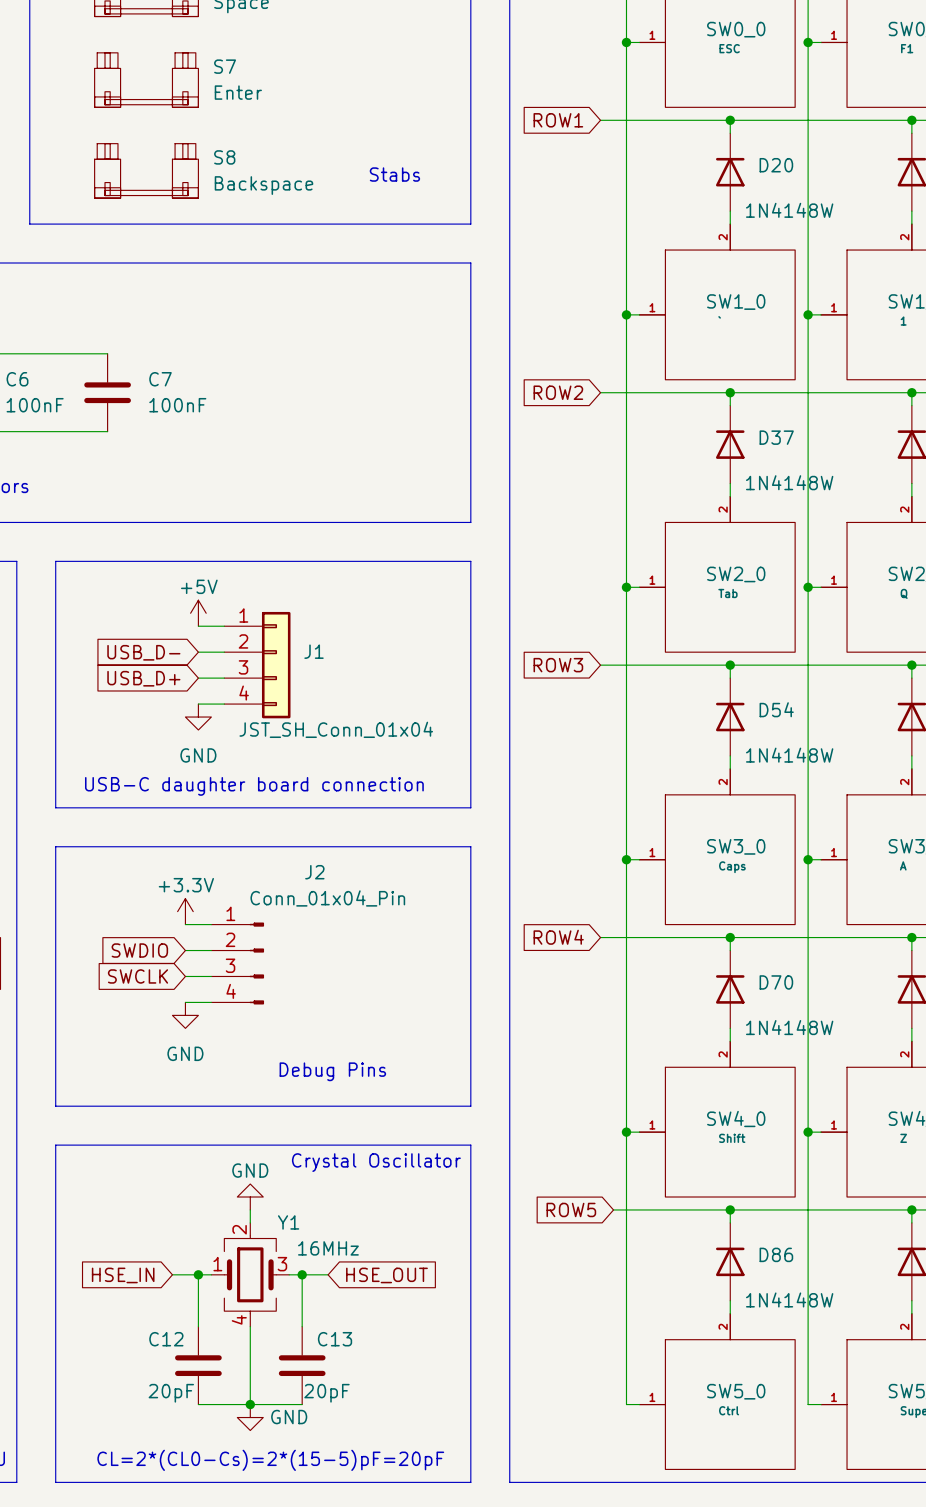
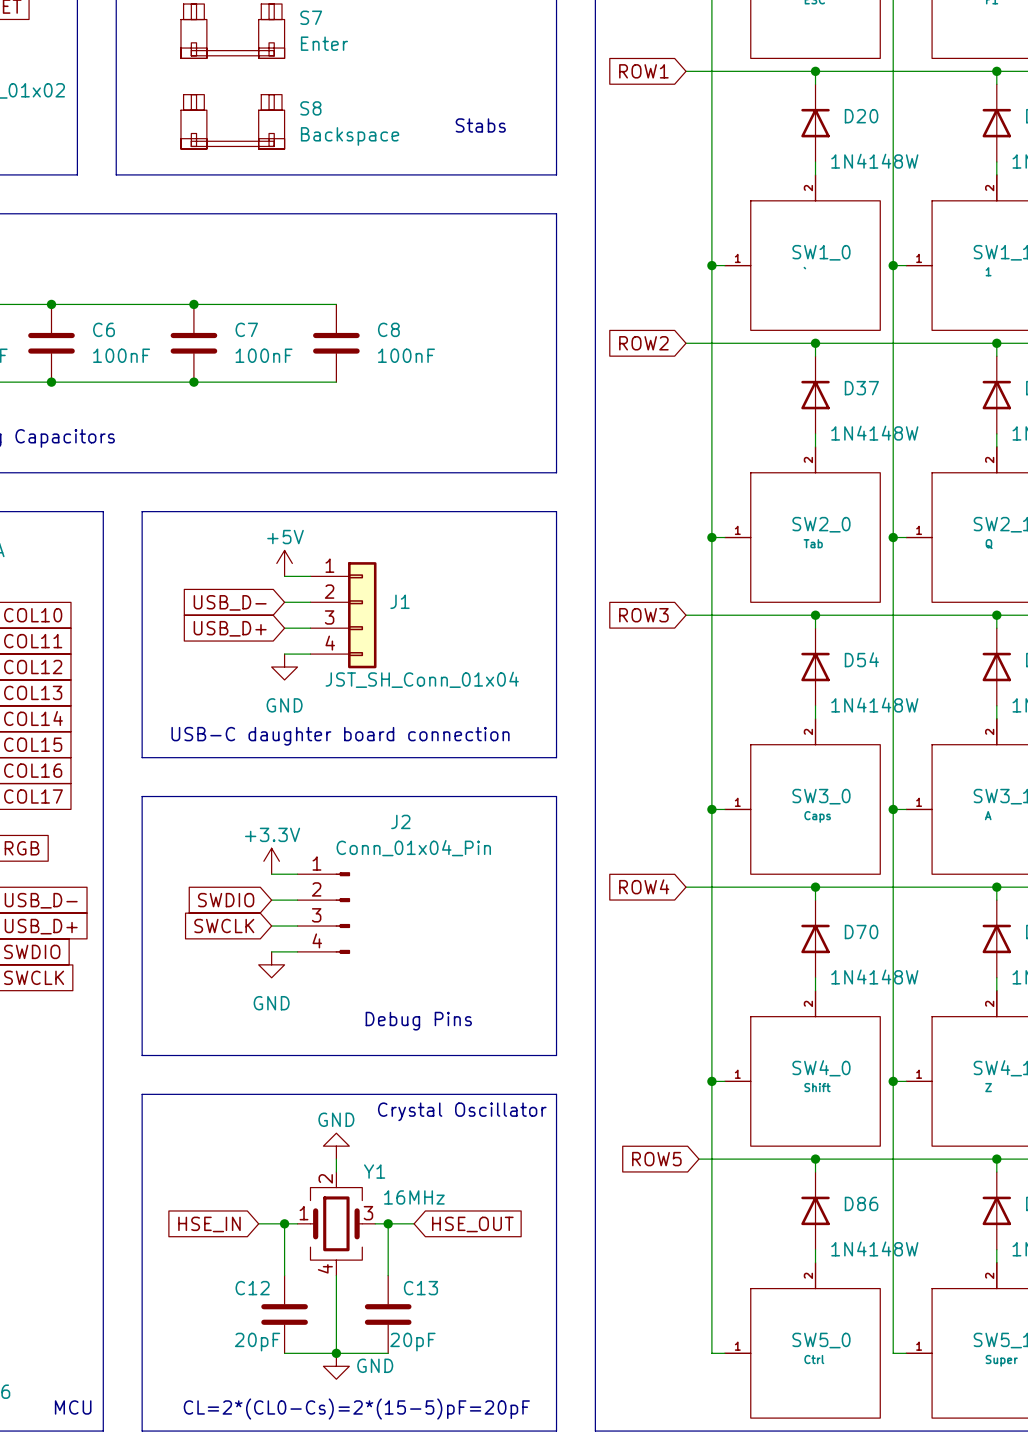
wire: none -> (193, 304) (336, 304)
junction: none -> (193, 304)
C8: none -> 100nF (336, 343)
wire: none -> (193, 382) (336, 382)
junction: none -> (193, 382)

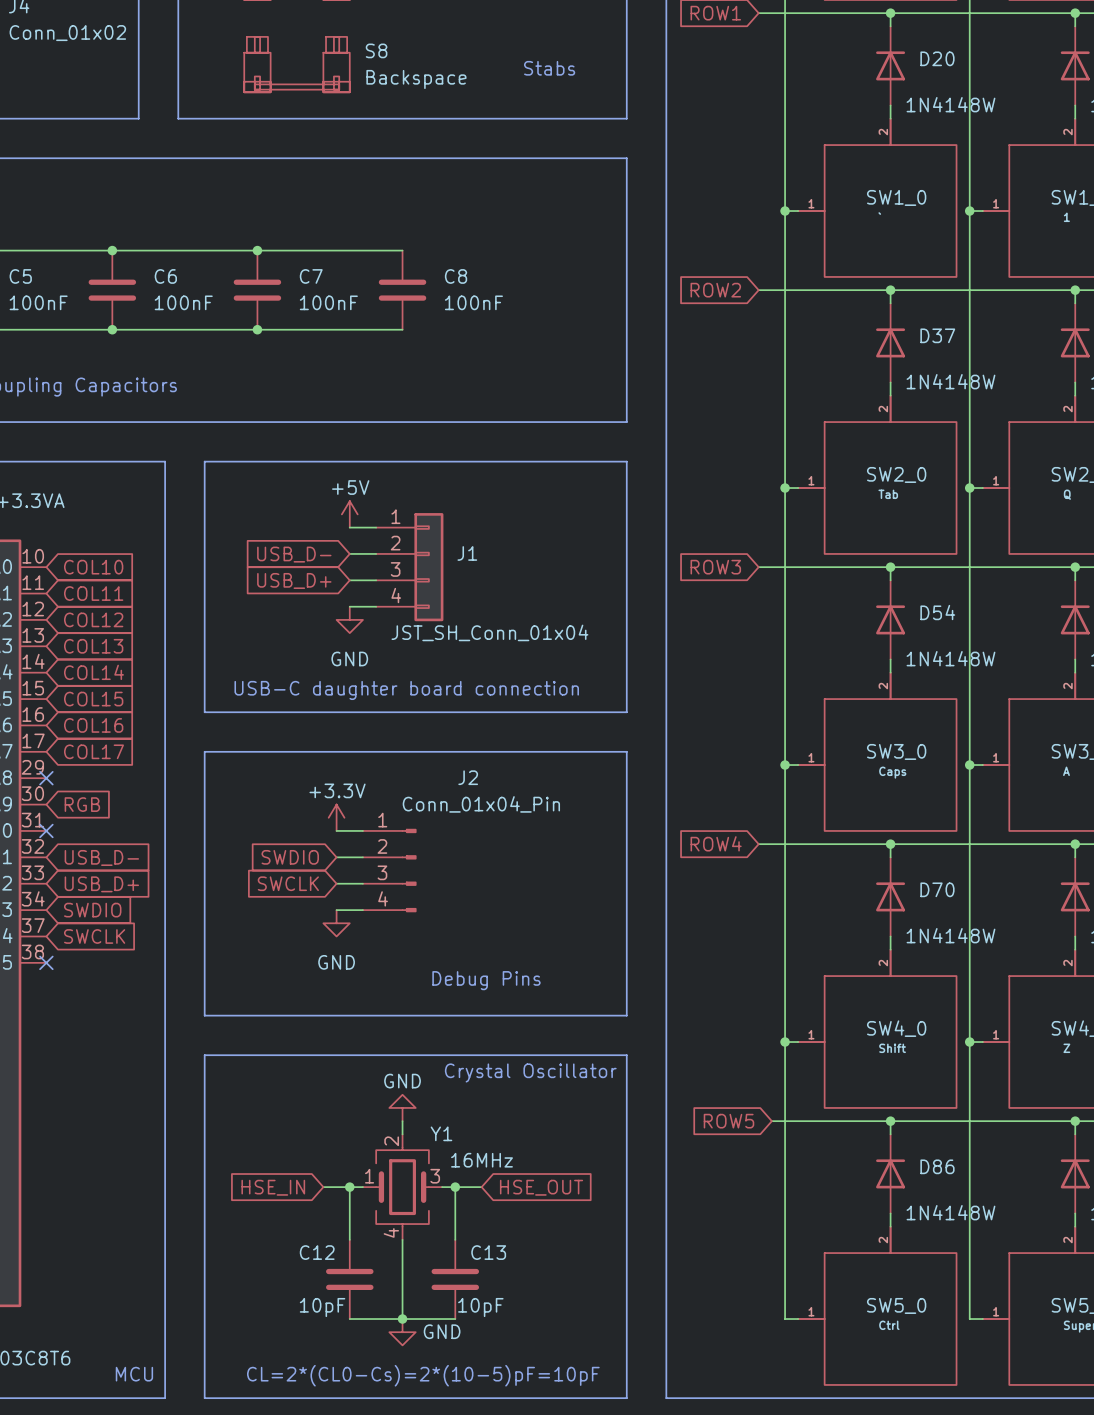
C12 value: 20pF (257, 1342) -> 10pF (322, 1307)
C13 value: 20pF (412, 1342) -> 10pF (480, 1307)
text: CL=2*(CL0-Cs)=2*(15-5)pF=20pF (356, 1409) -> CL=2*(CL0-Cs)=2*(10-5)pF=10pF (423, 1375)

